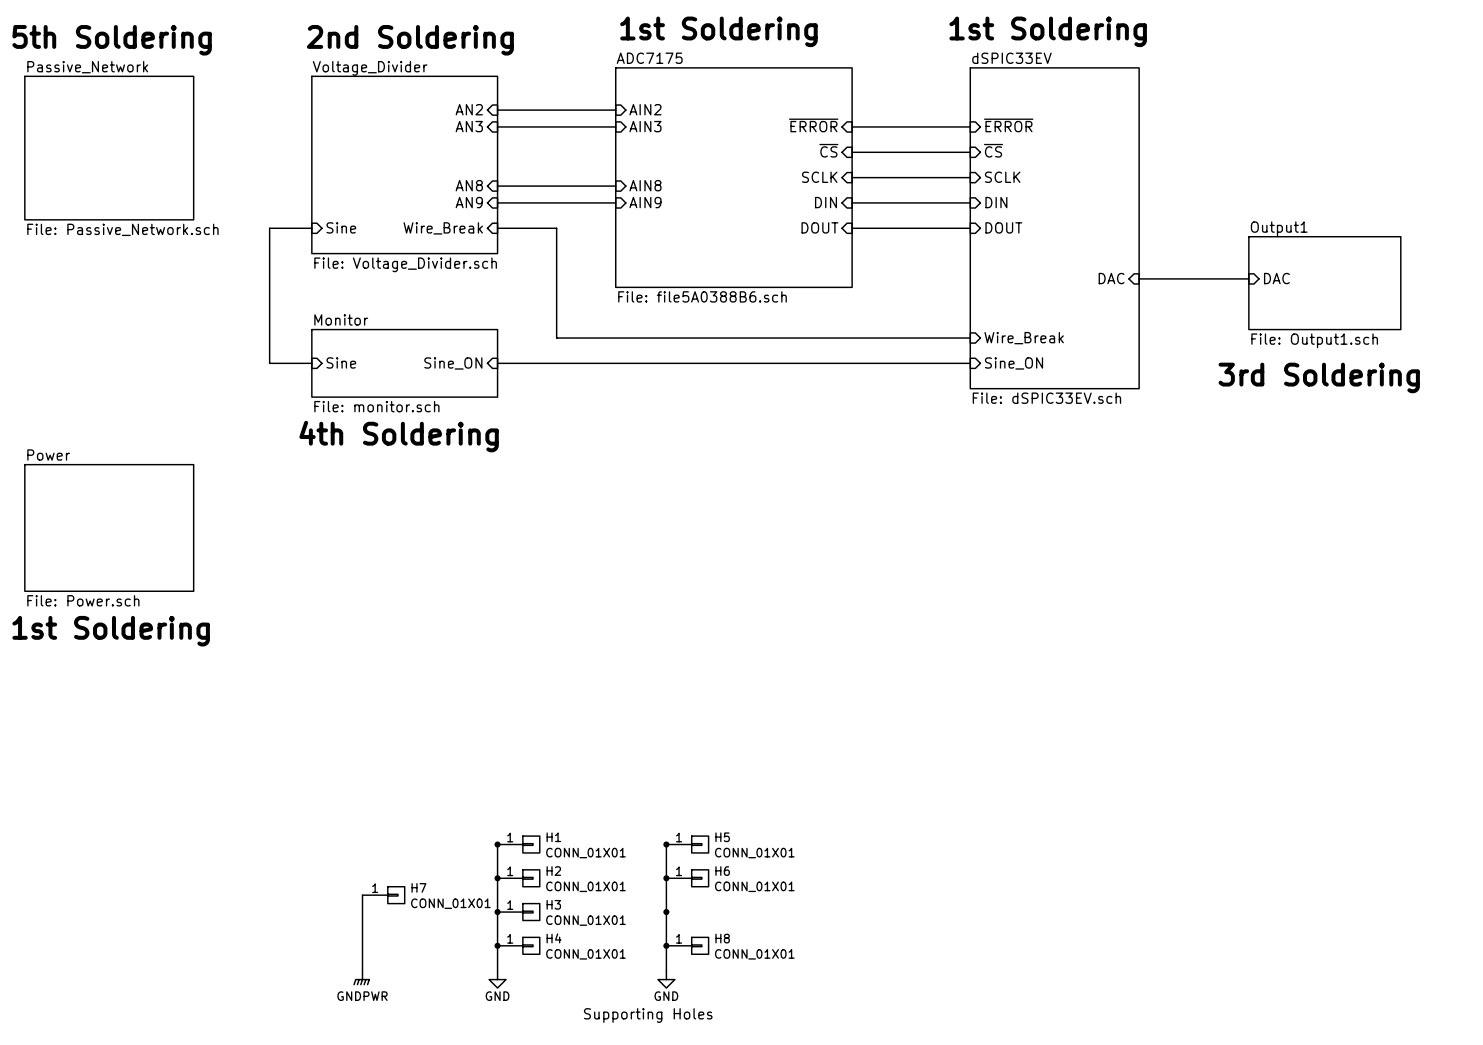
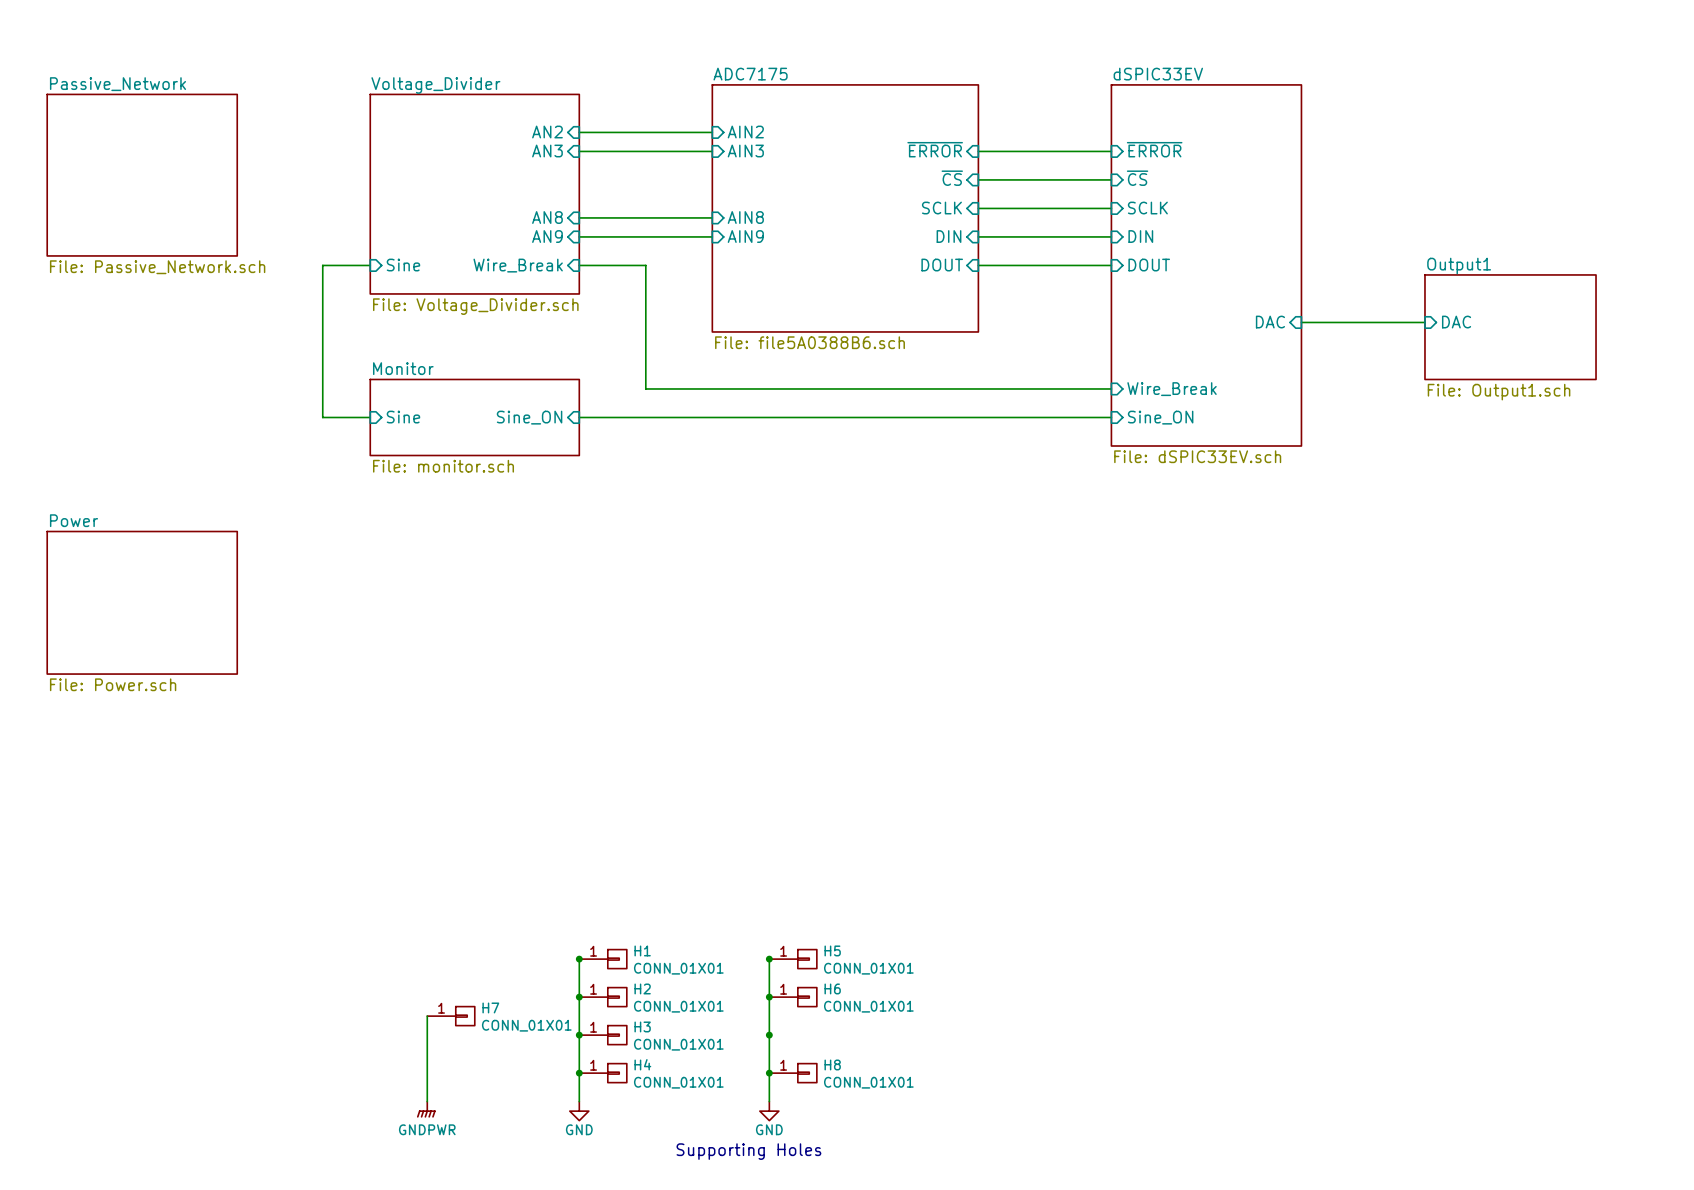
text: 1st Soldering (718, 31) -> none
text: 1st Soldering (1048, 31) -> none
text: 5th Soldering (112, 40) -> none
text: 2nd Soldering (410, 40) -> none
text: 3rd Soldering (1319, 377) -> none
text: 4th Soldering (399, 436) -> none
text: 1st Soldering (111, 631) -> none

